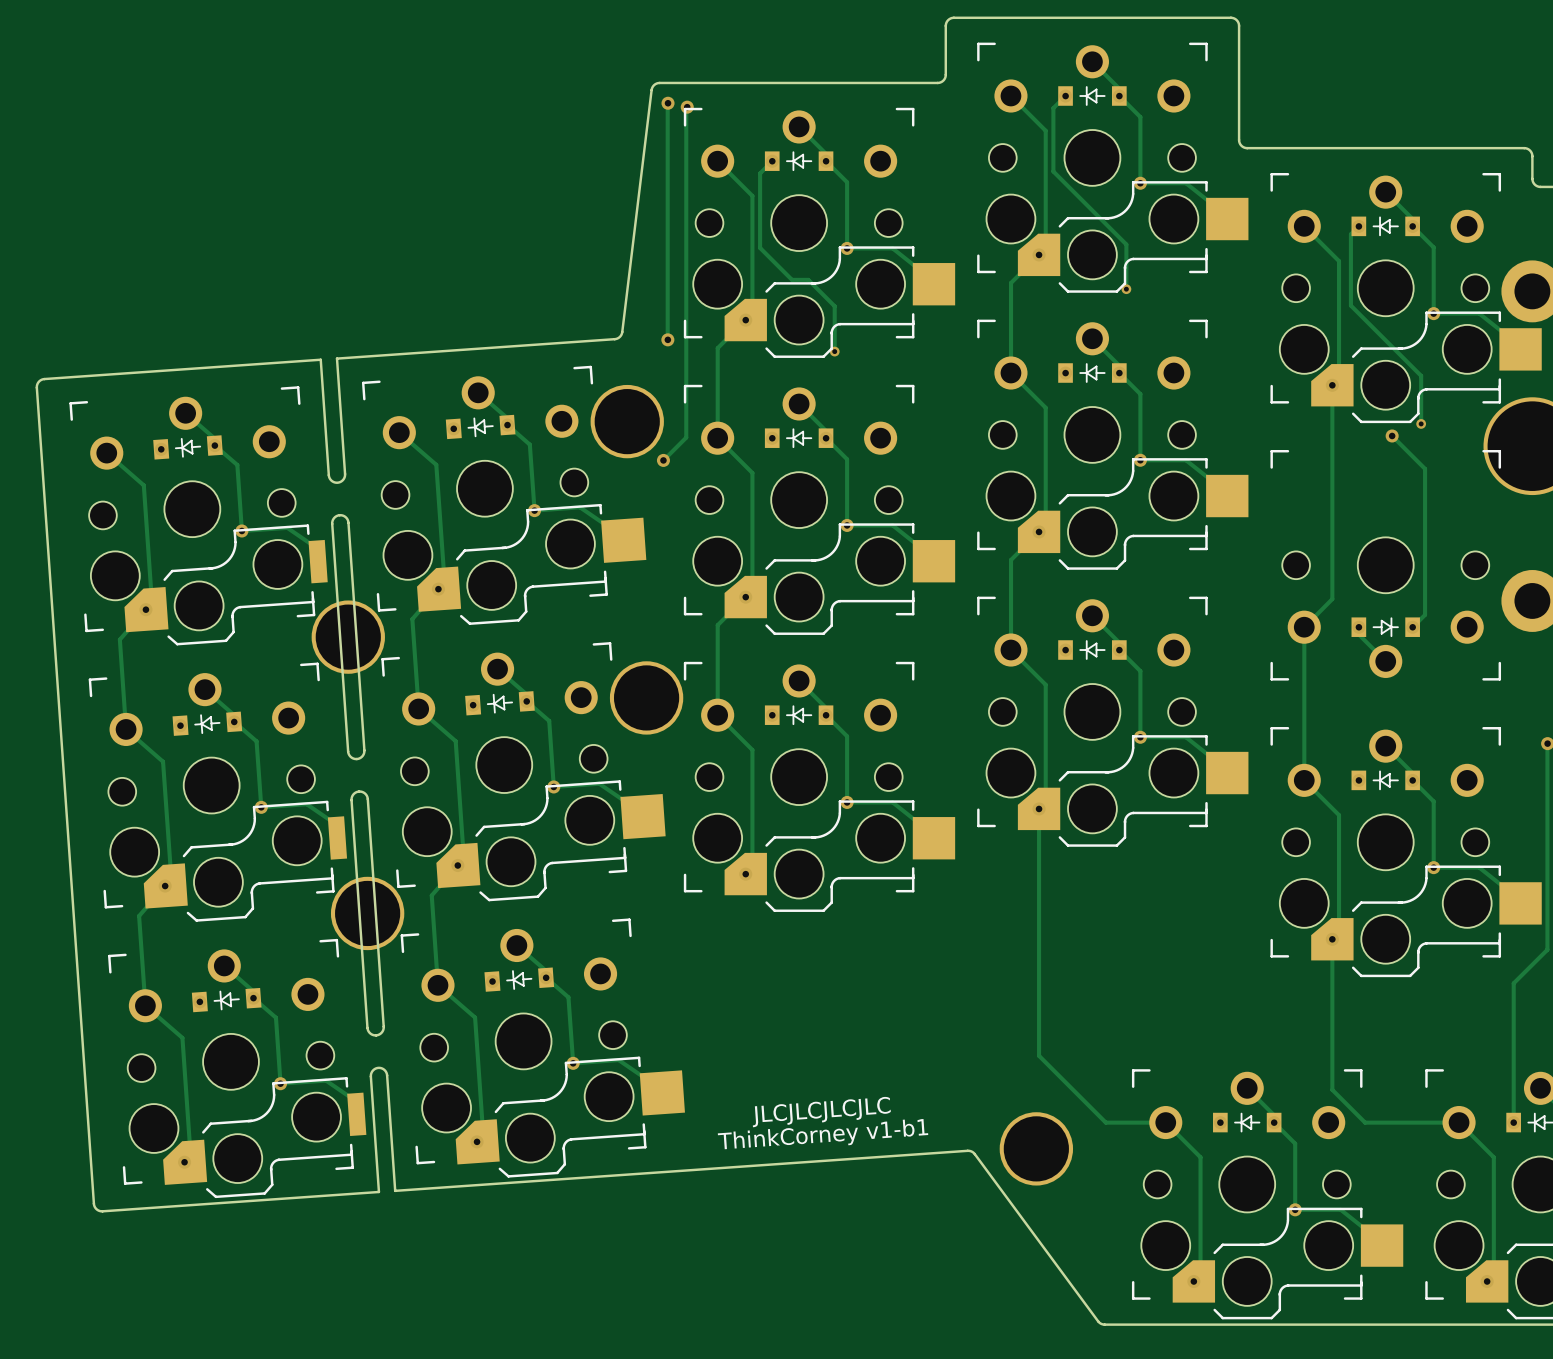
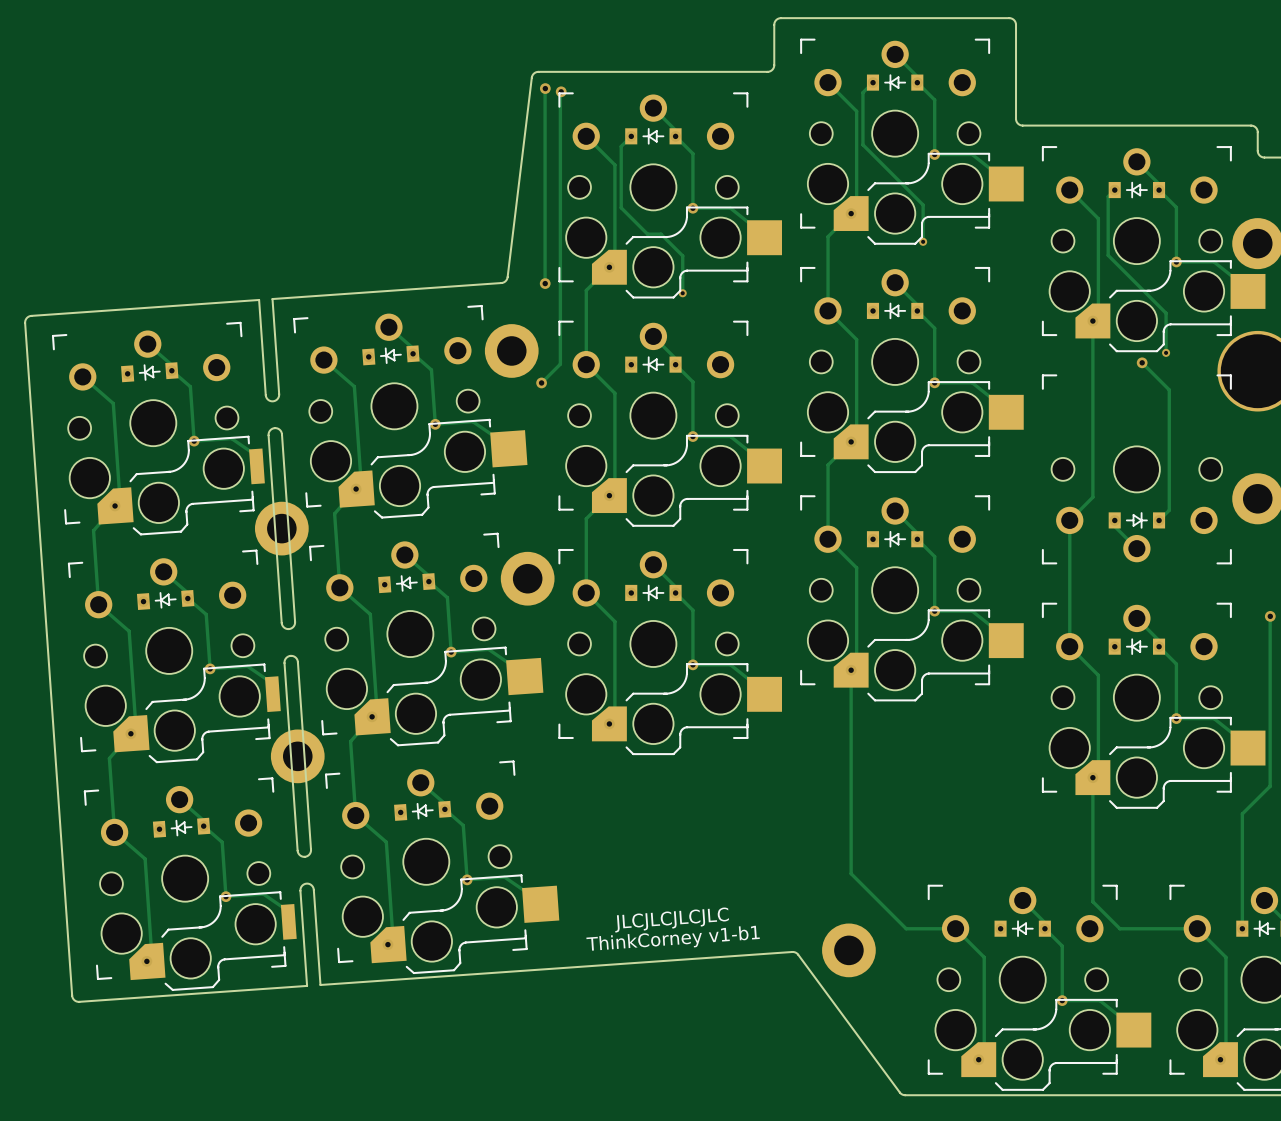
part footprint: [590, 384, 664, 459] -> [484, 324, 539, 378]
part footprint: [311, 600, 385, 674] -> [254, 501, 309, 556]
part footprint: [609, 661, 684, 735] -> [500, 551, 555, 606]
part footprint: [330, 876, 405, 951] -> [270, 729, 325, 784]
part footprint: [999, 1112, 1074, 1186] -> [822, 923, 876, 978]

